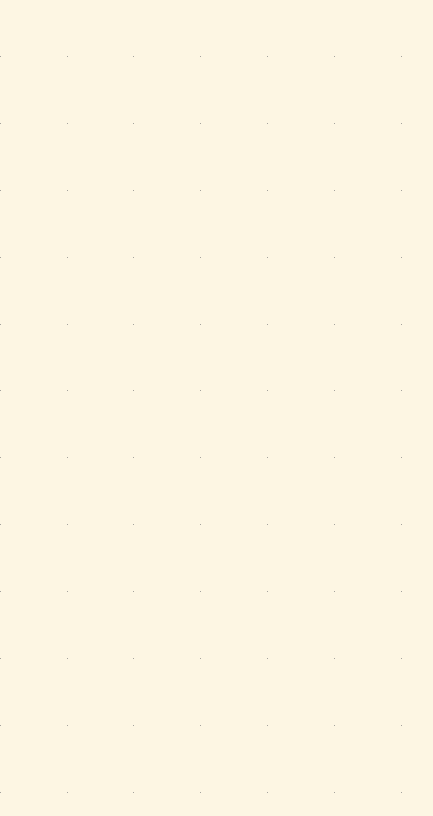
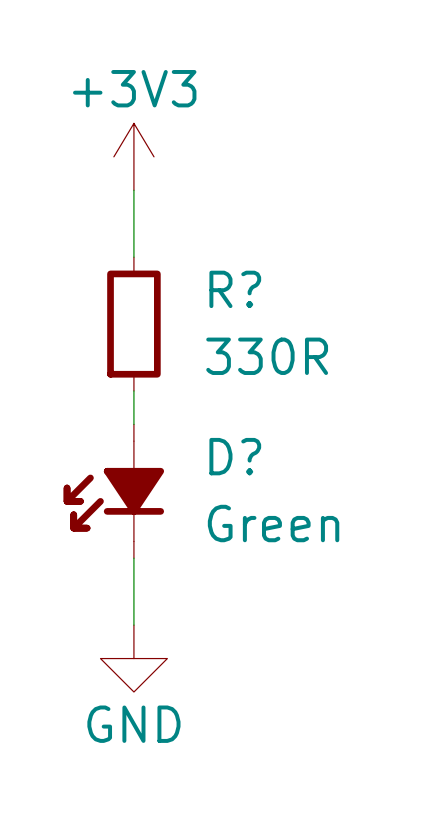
power symbol: none -> +3V3 (133, 156)
wire: none -> (133, 190) (133, 257)
R?: none -> (133, 324)
wire: none -> (133, 390) (133, 424)
D?: none -> (113, 491)
wire: none -> (133, 558) (133, 625)
power symbol: none -> GND (133, 658)

